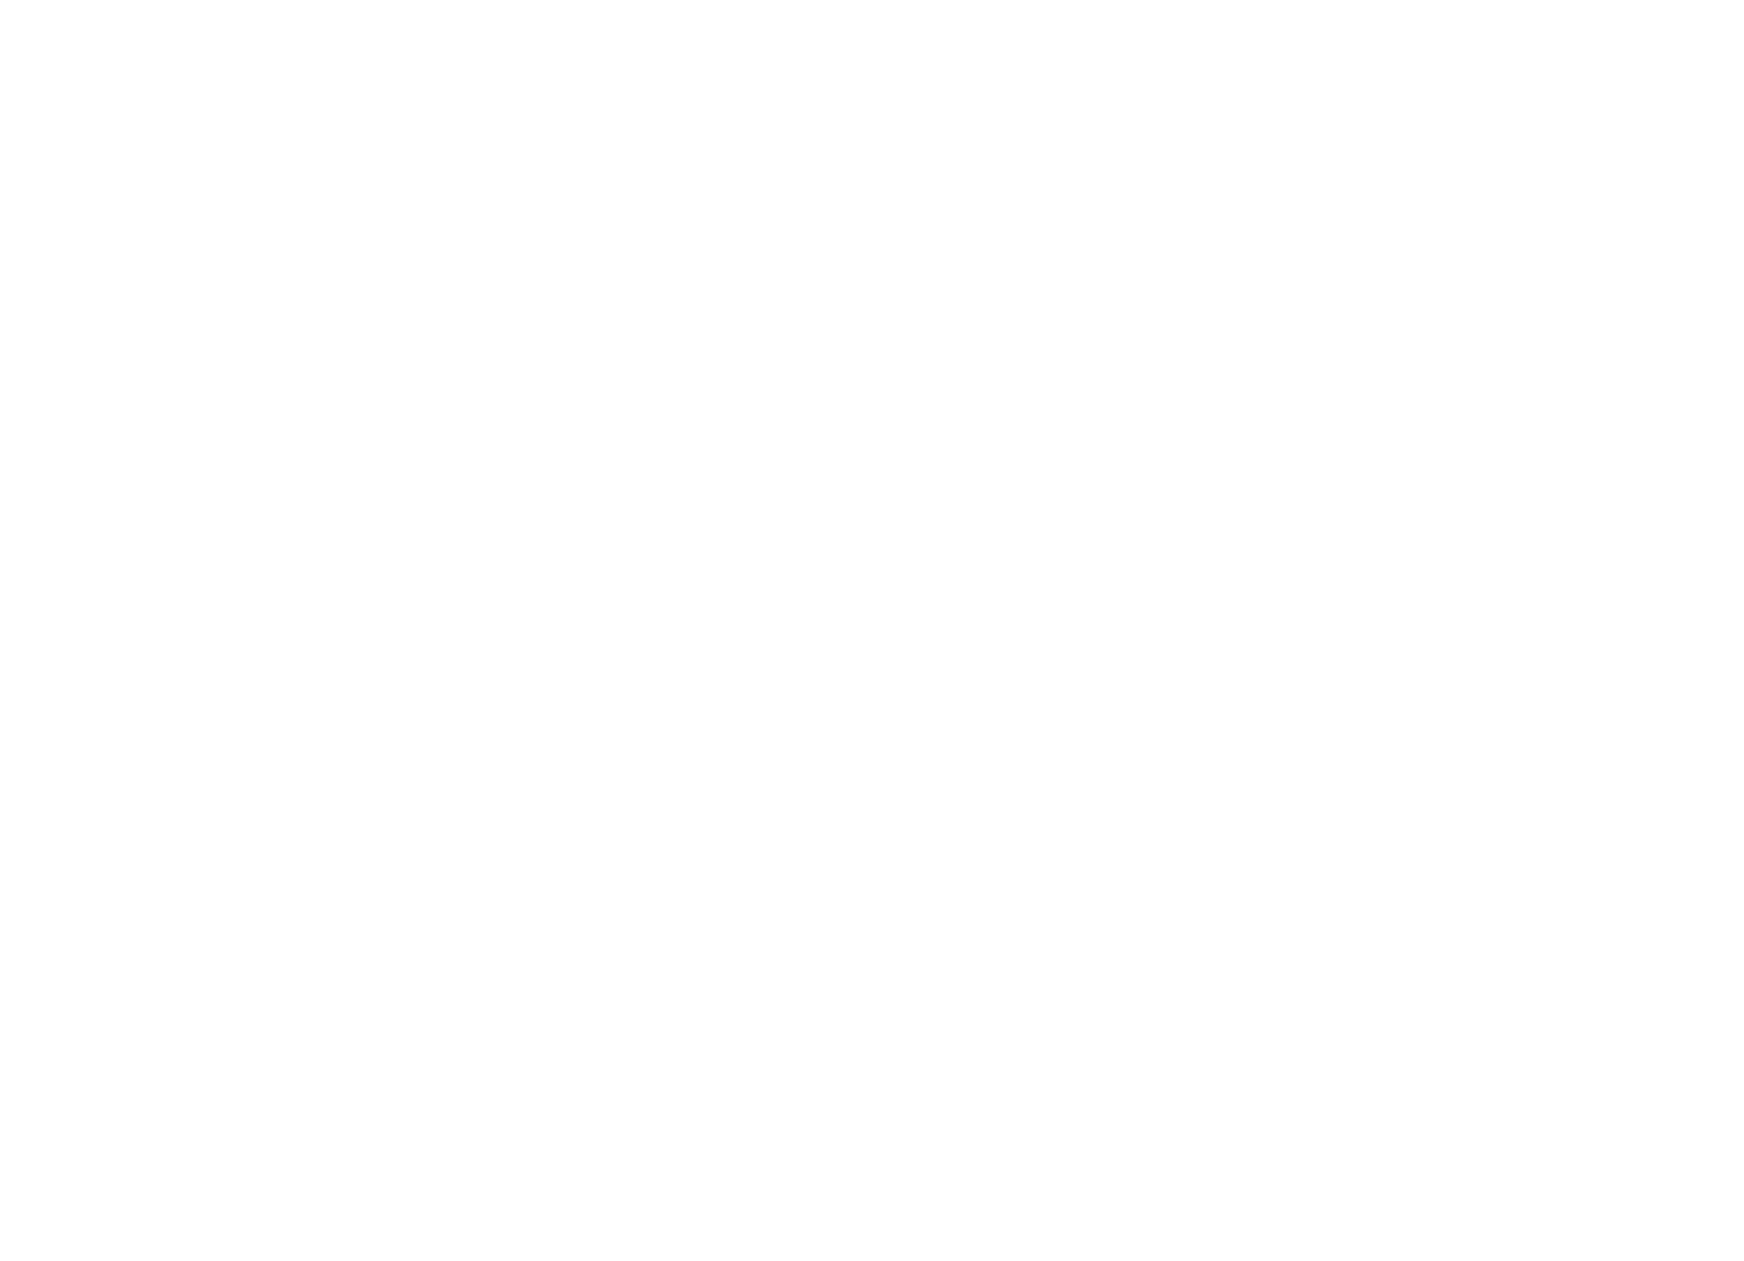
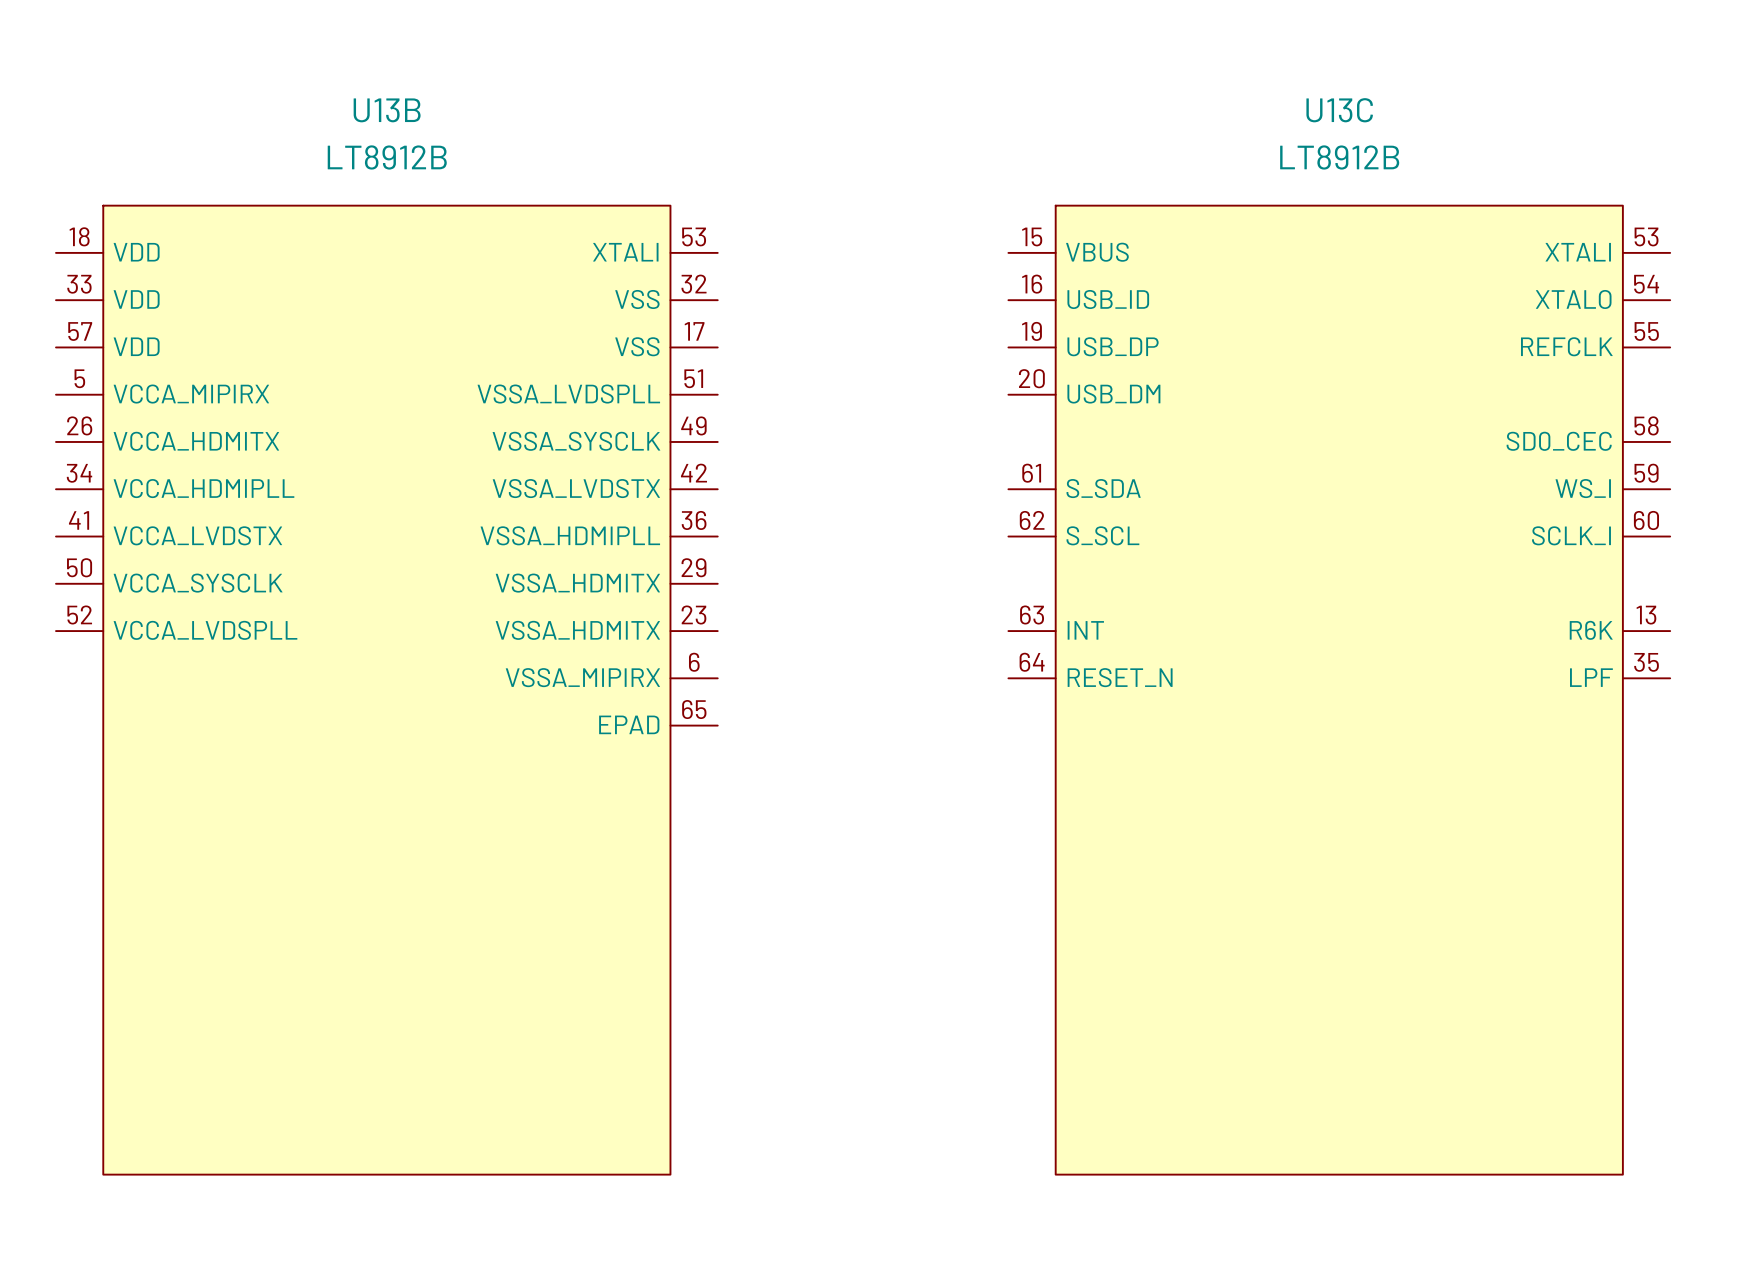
U13B: none -> LT8912B (386, 690)
U13C: none -> LT8912B (1339, 690)

